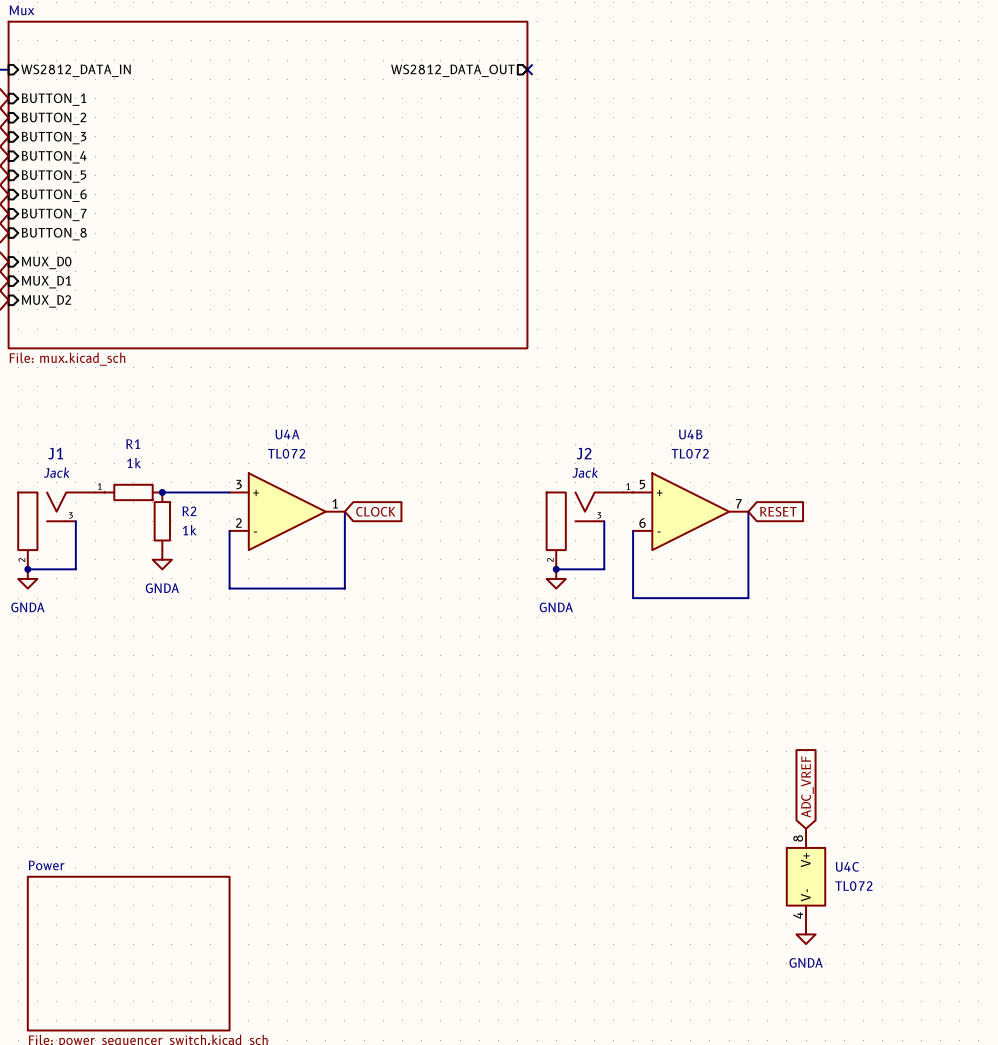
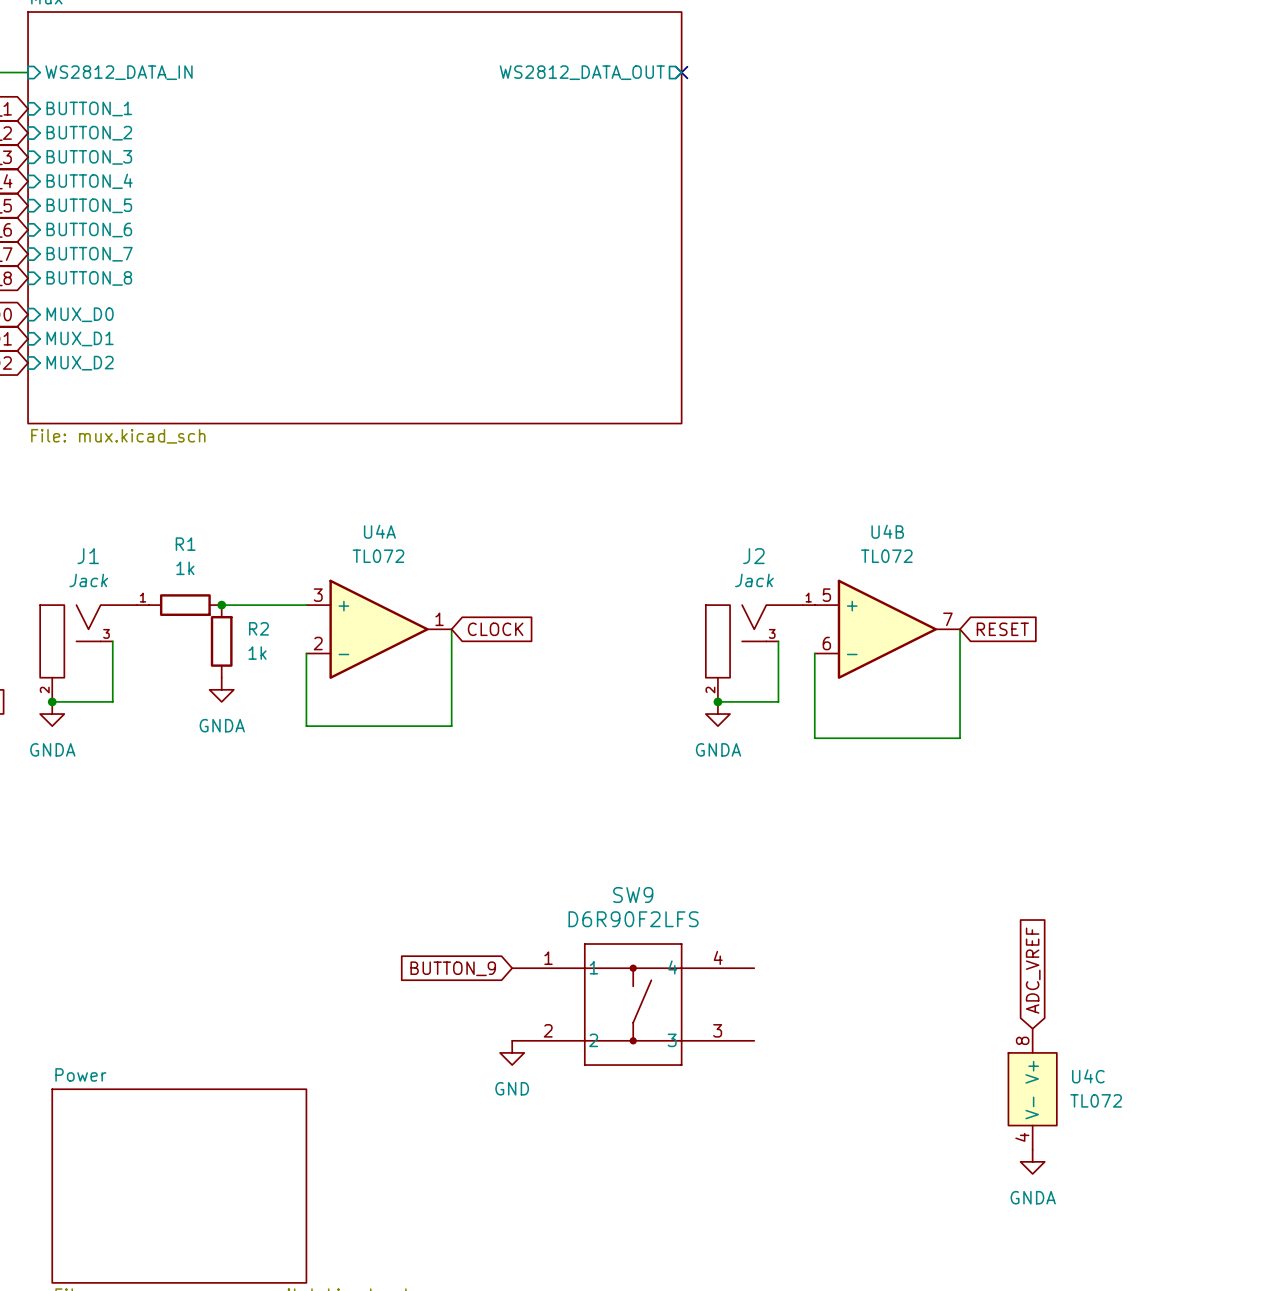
global label: none -> BUTTON_9 (453, 968)
SW9: none -> D6R90F2LFS (633, 1004)
power symbol: none -> GND (512, 1052)

